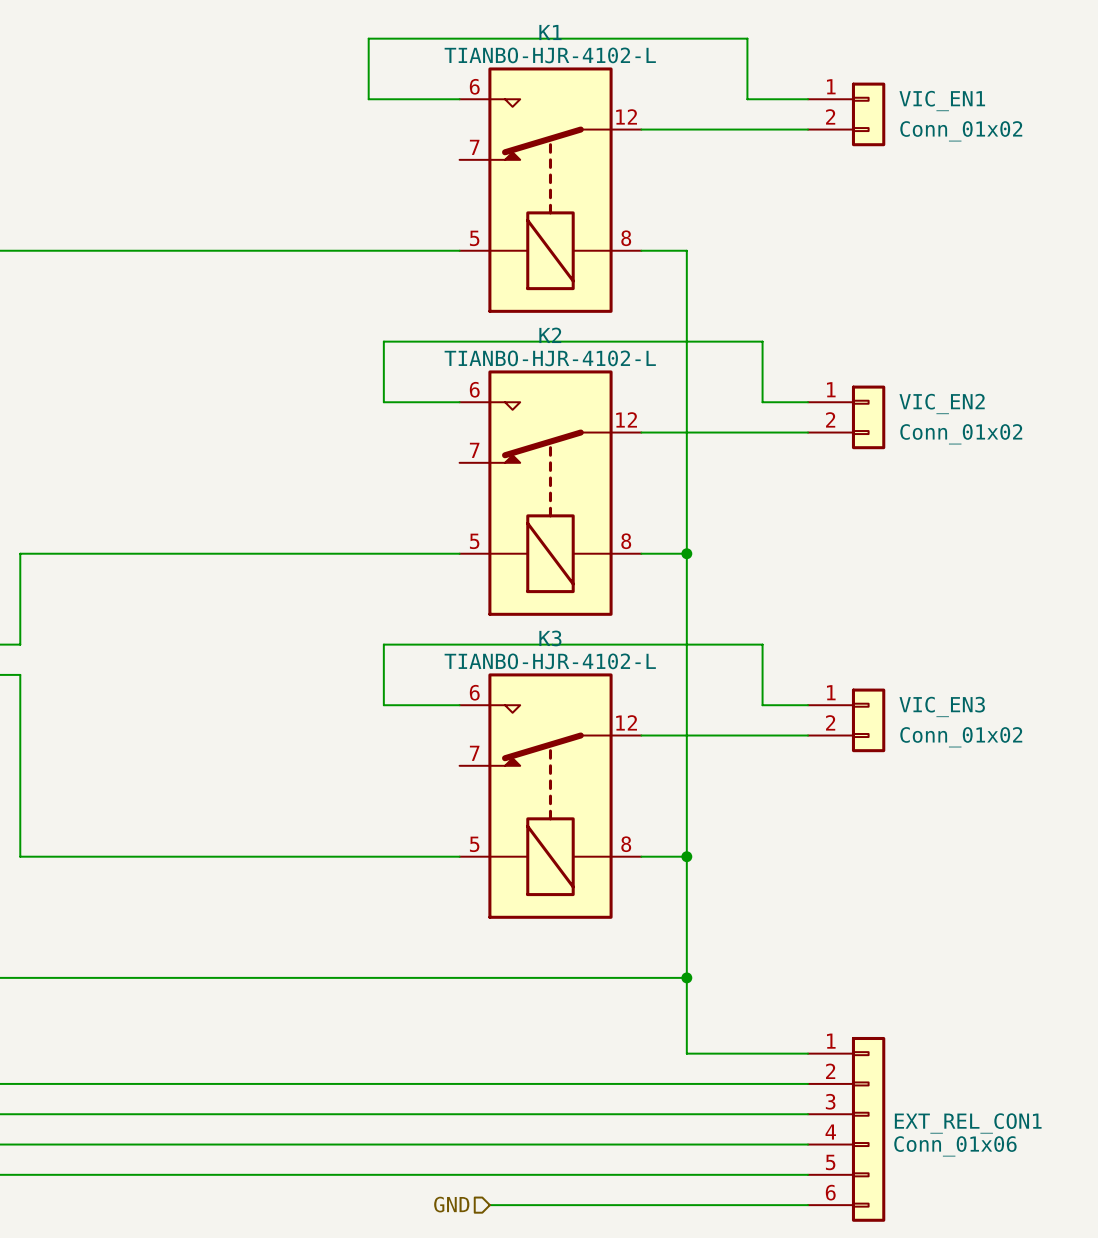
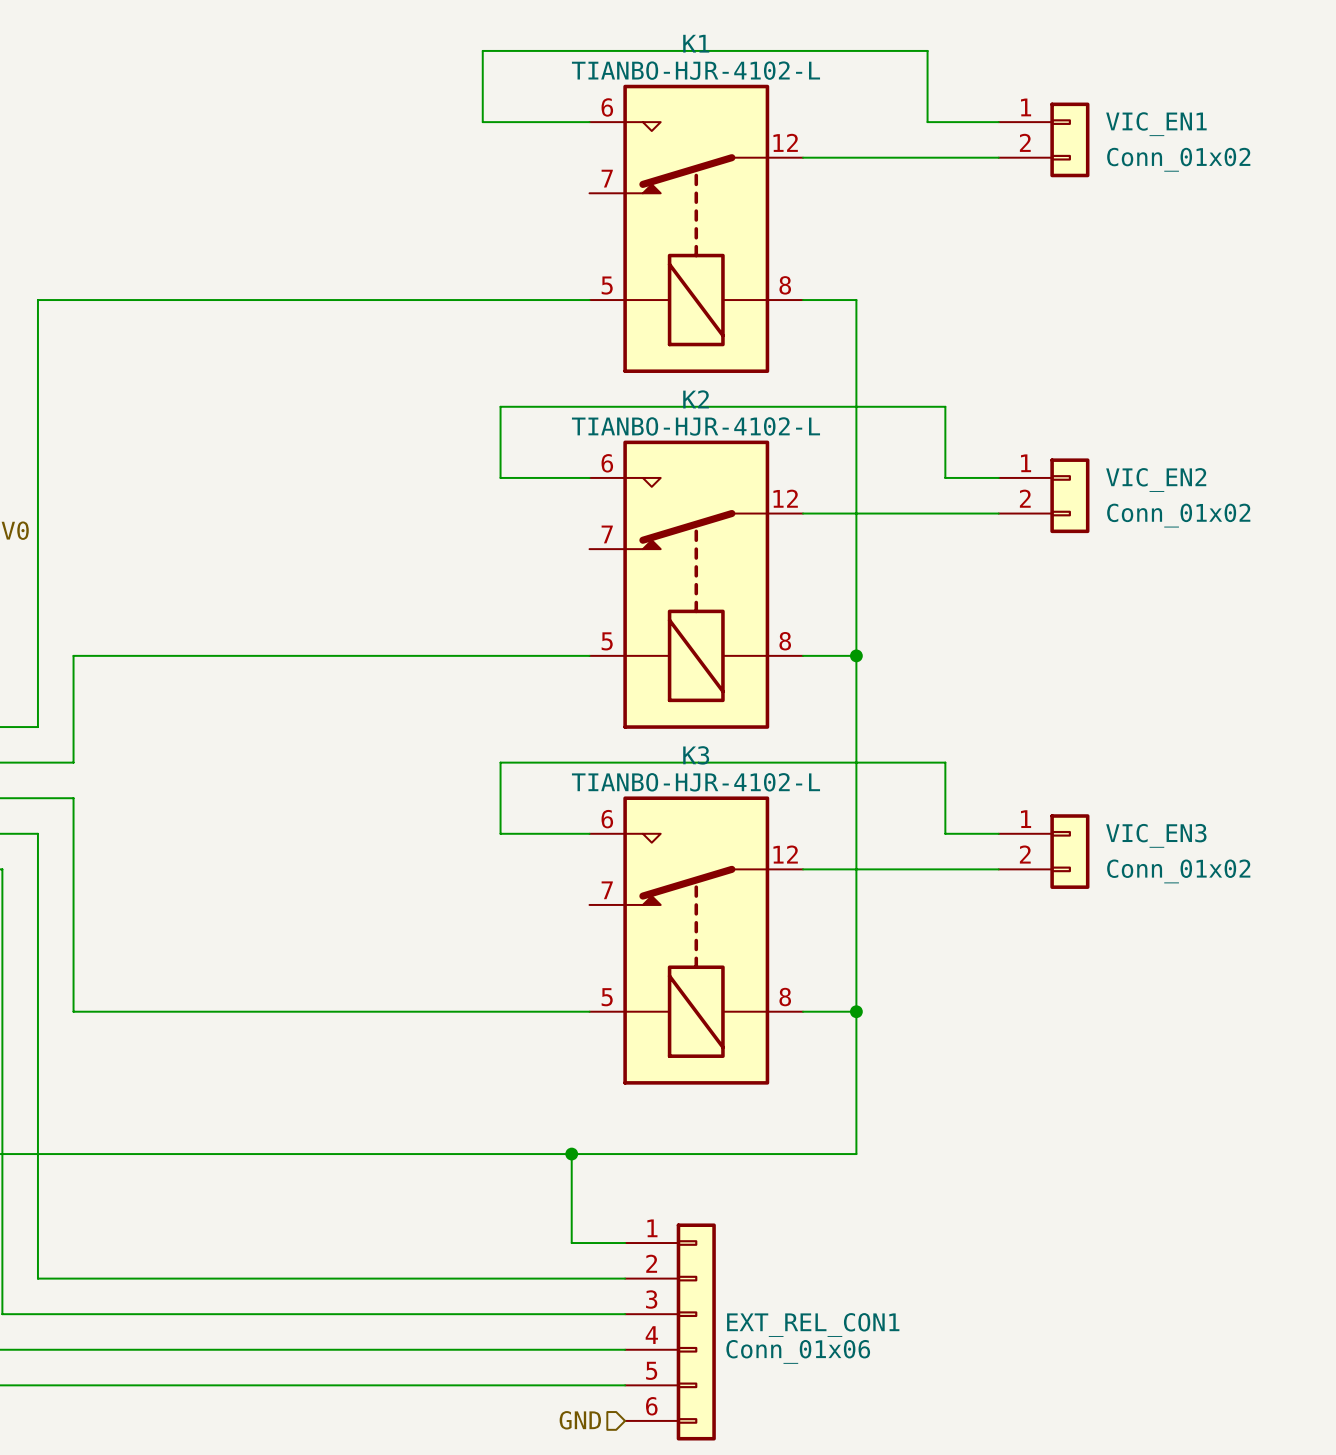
wire: none -> (571, 1154) (571, 1243) (625, 1243)
junction: none -> (571, 1154)
wire: (686, 977) (686, 1053) (808, 1053) -> none
junction: (686, 977) -> none
wire: (489, 1083) (808, 1083) -> none
wire: (489, 1114) (808, 1114) -> none
EXT_REL_CON1 position: (846, 1129) -> (670, 1331)
wire: (489, 1144) (808, 1144) -> none
wire: (489, 1174) (808, 1174) -> none
wire: (489, 1205) (808, 1205) -> none

